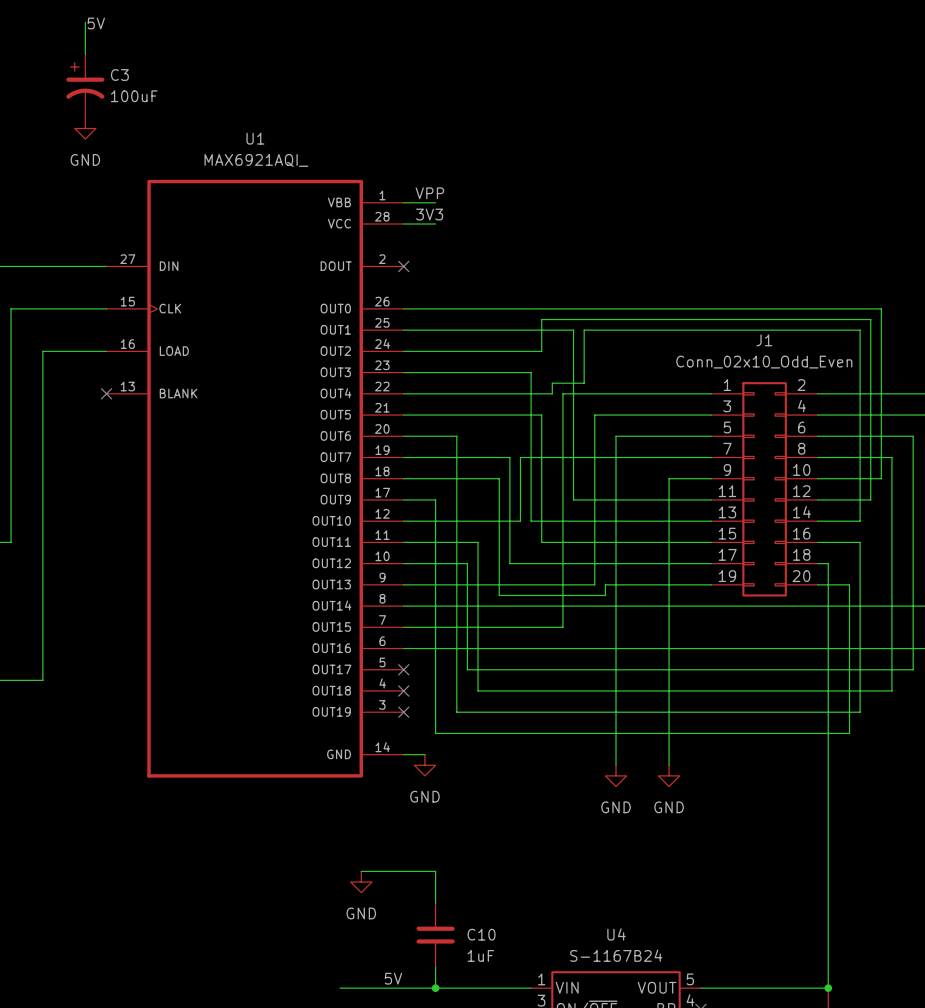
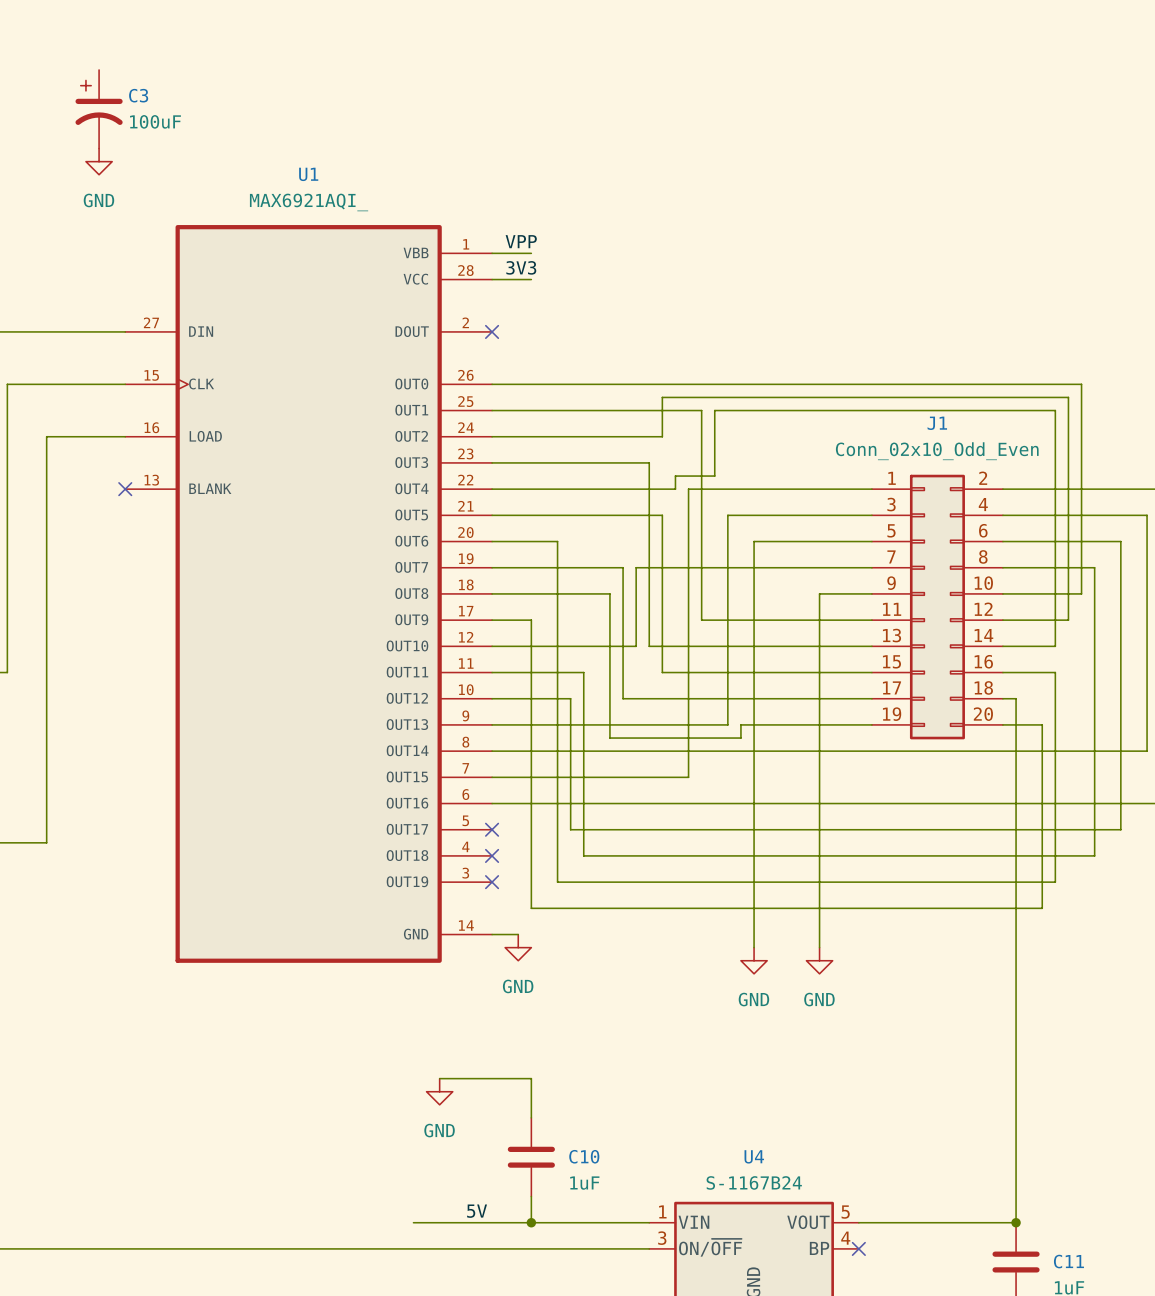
wire: (85, 22) (85, 54) -> none
label: 5V (96, 23) -> none

